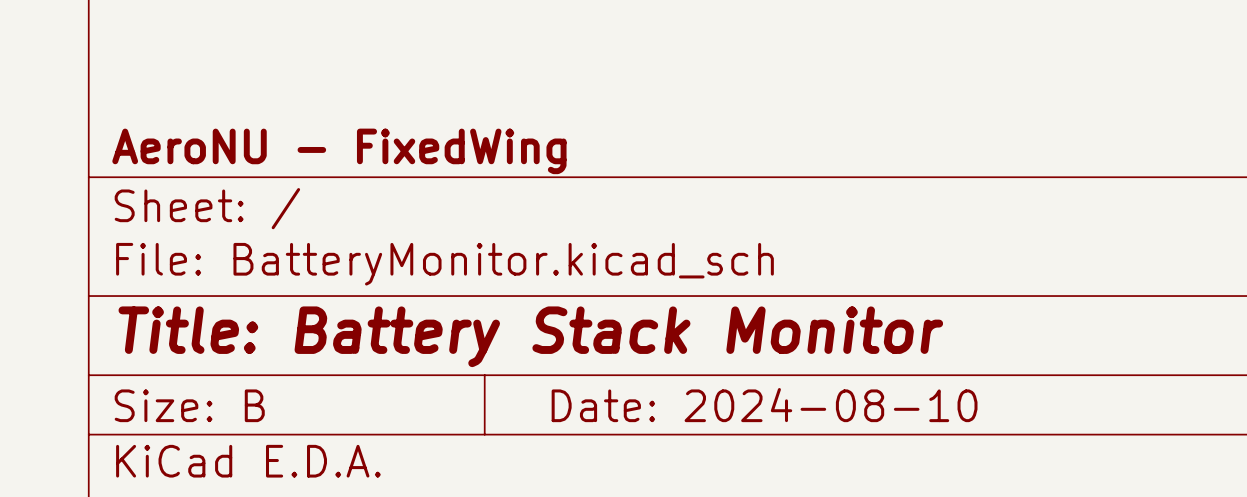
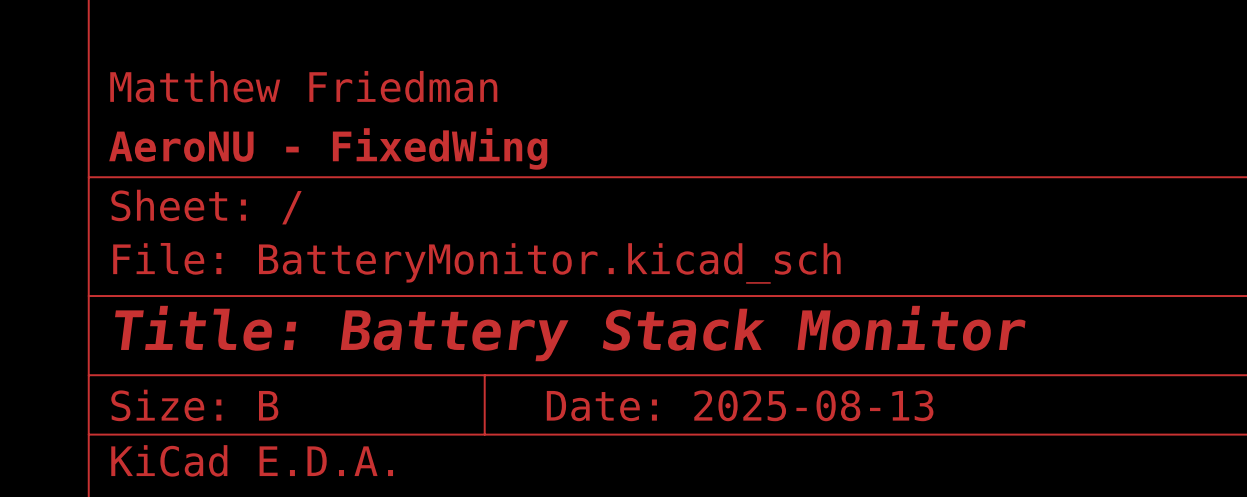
title block: none -> Matthew Friedman (303, 86)
title block: Date: 2024-08-10 (764, 405) -> Date: 2025-08-13 (740, 405)

